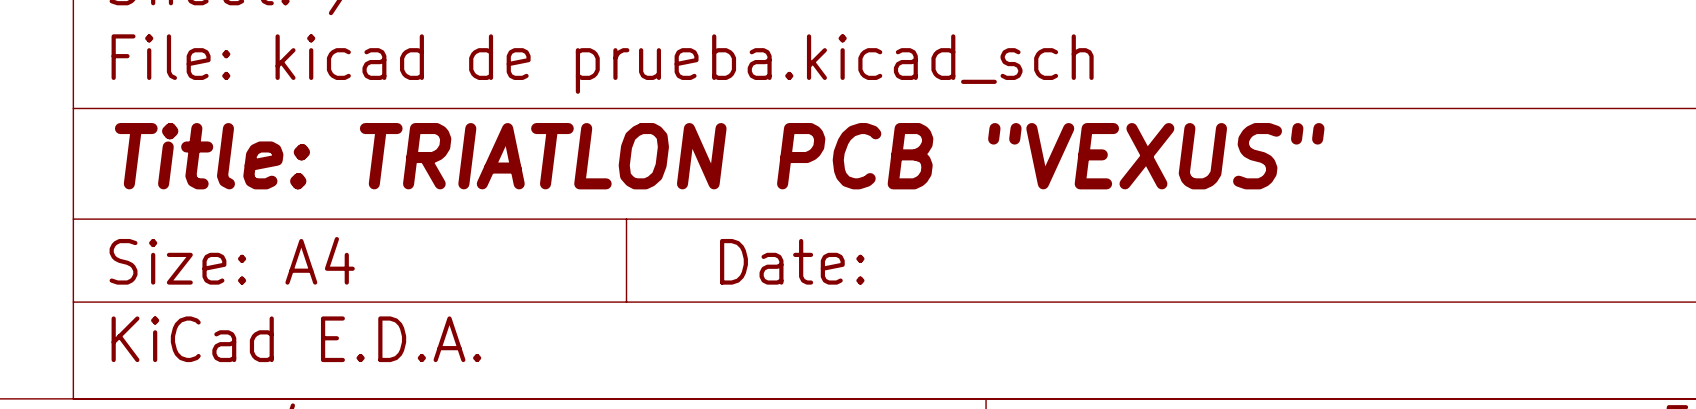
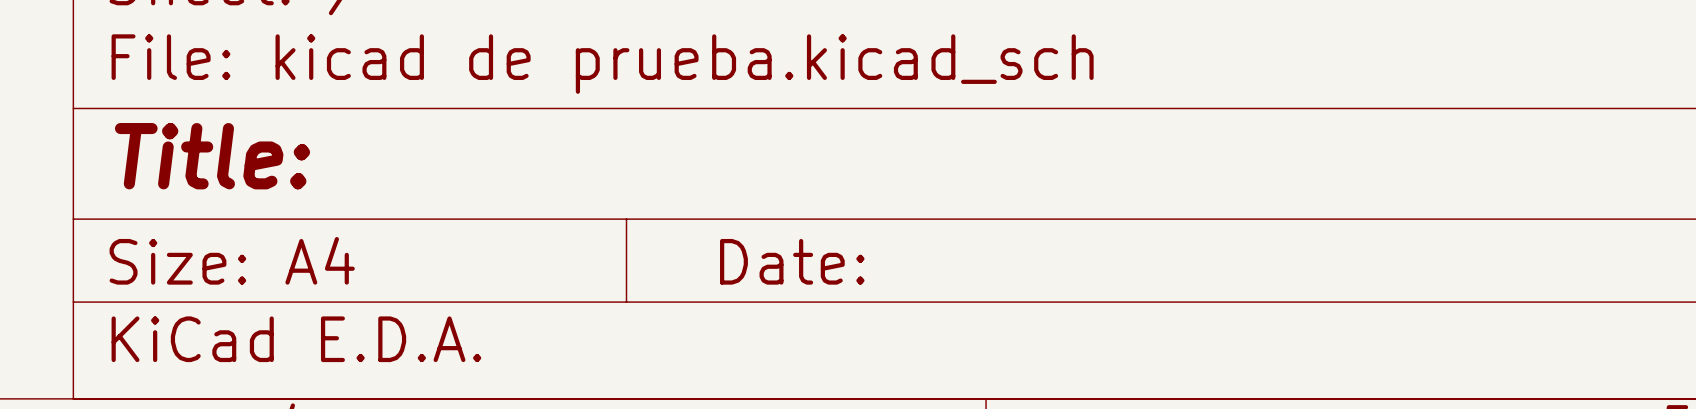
title block: Title: TRIATLON PCB "VEXUS" (719, 156) -> Title: (212, 156)

